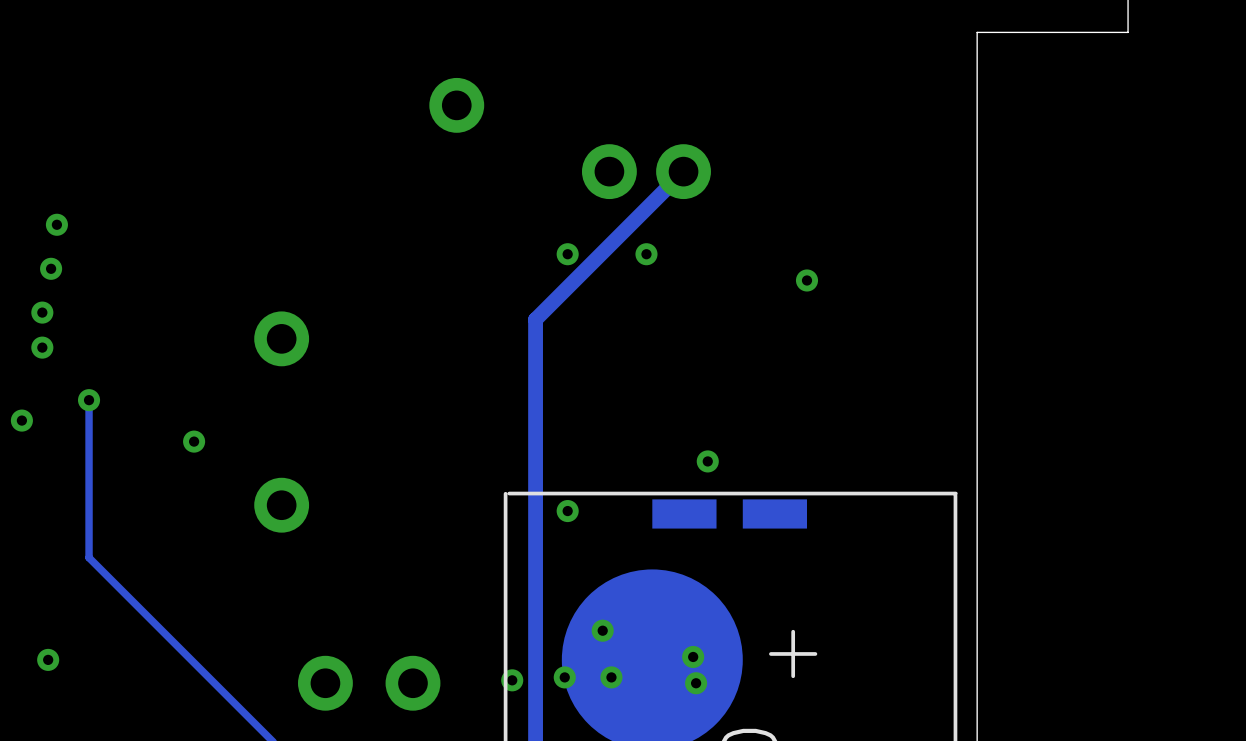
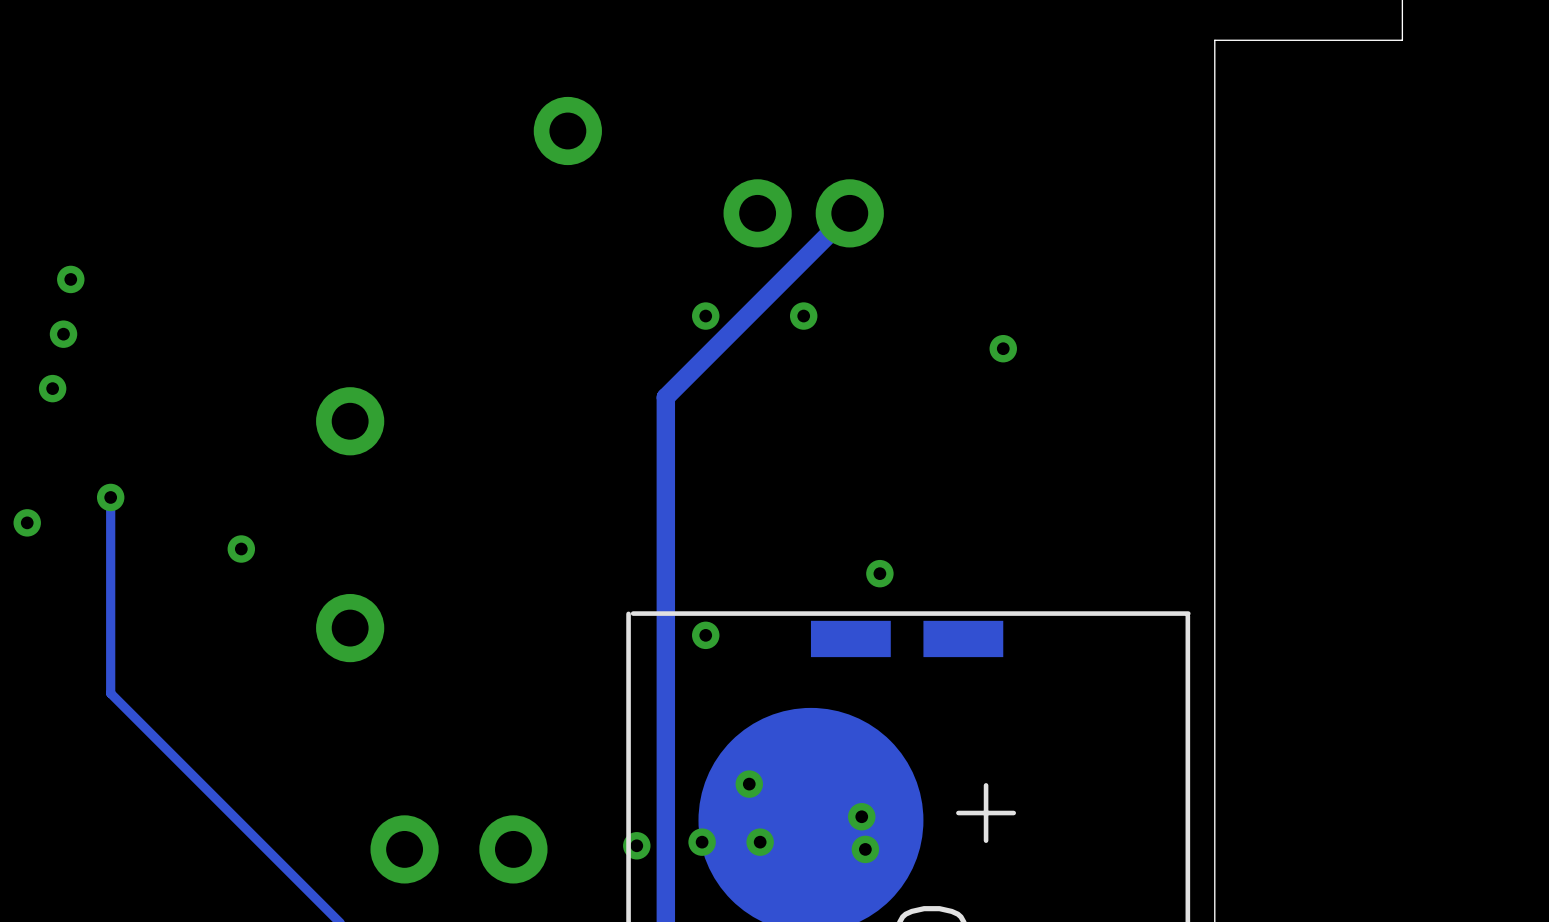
via: (42, 347) -> none
via: (48, 659) -> none

